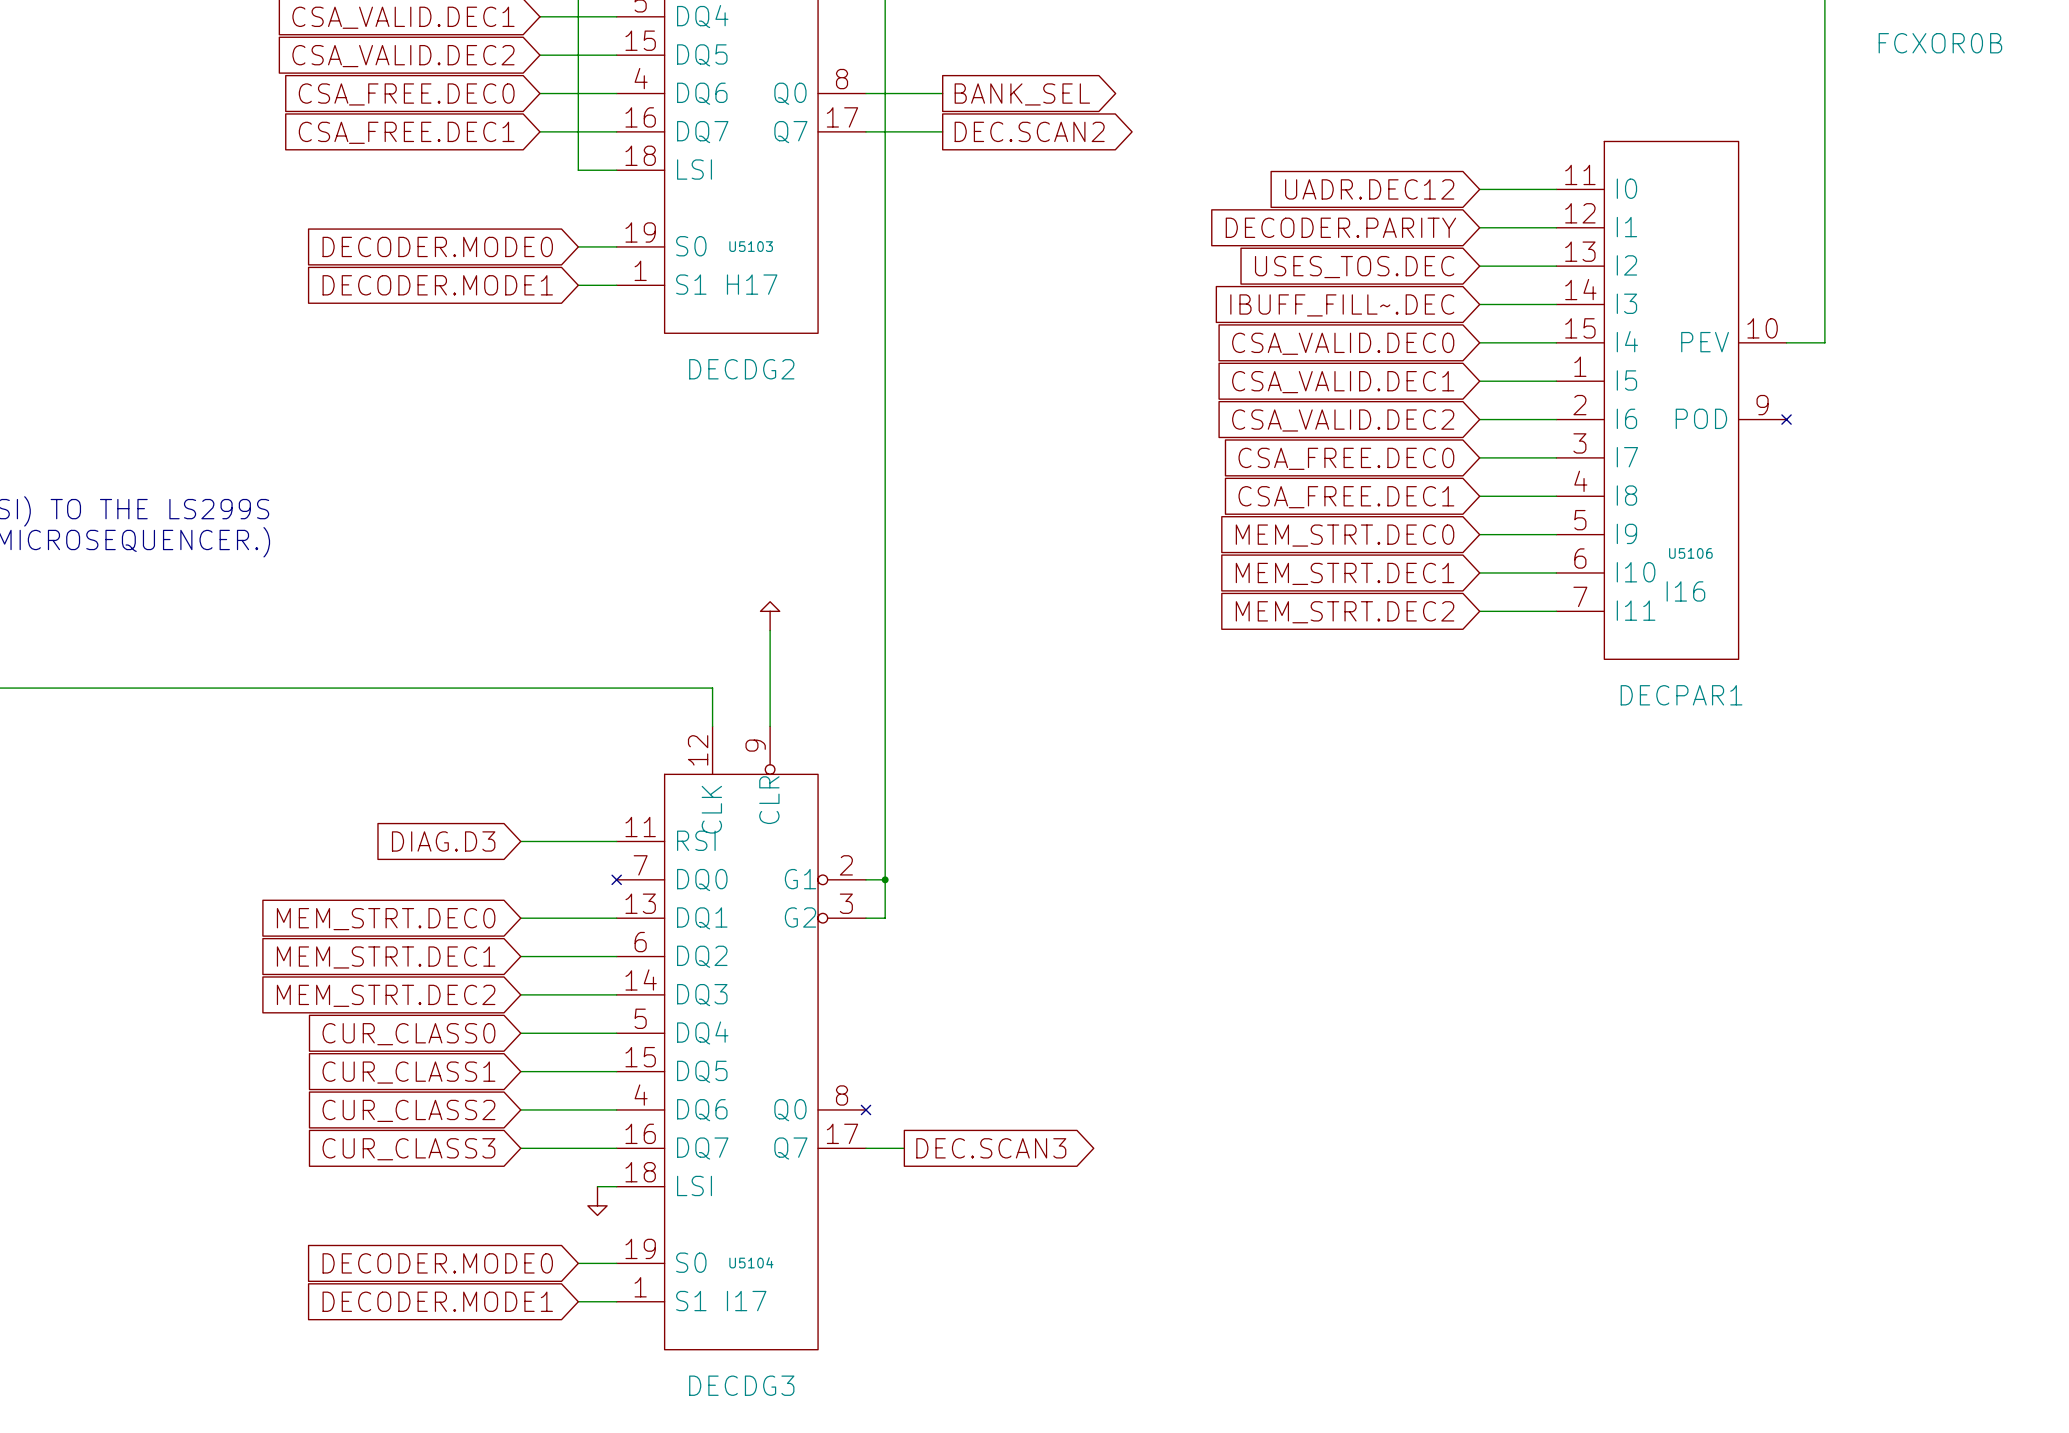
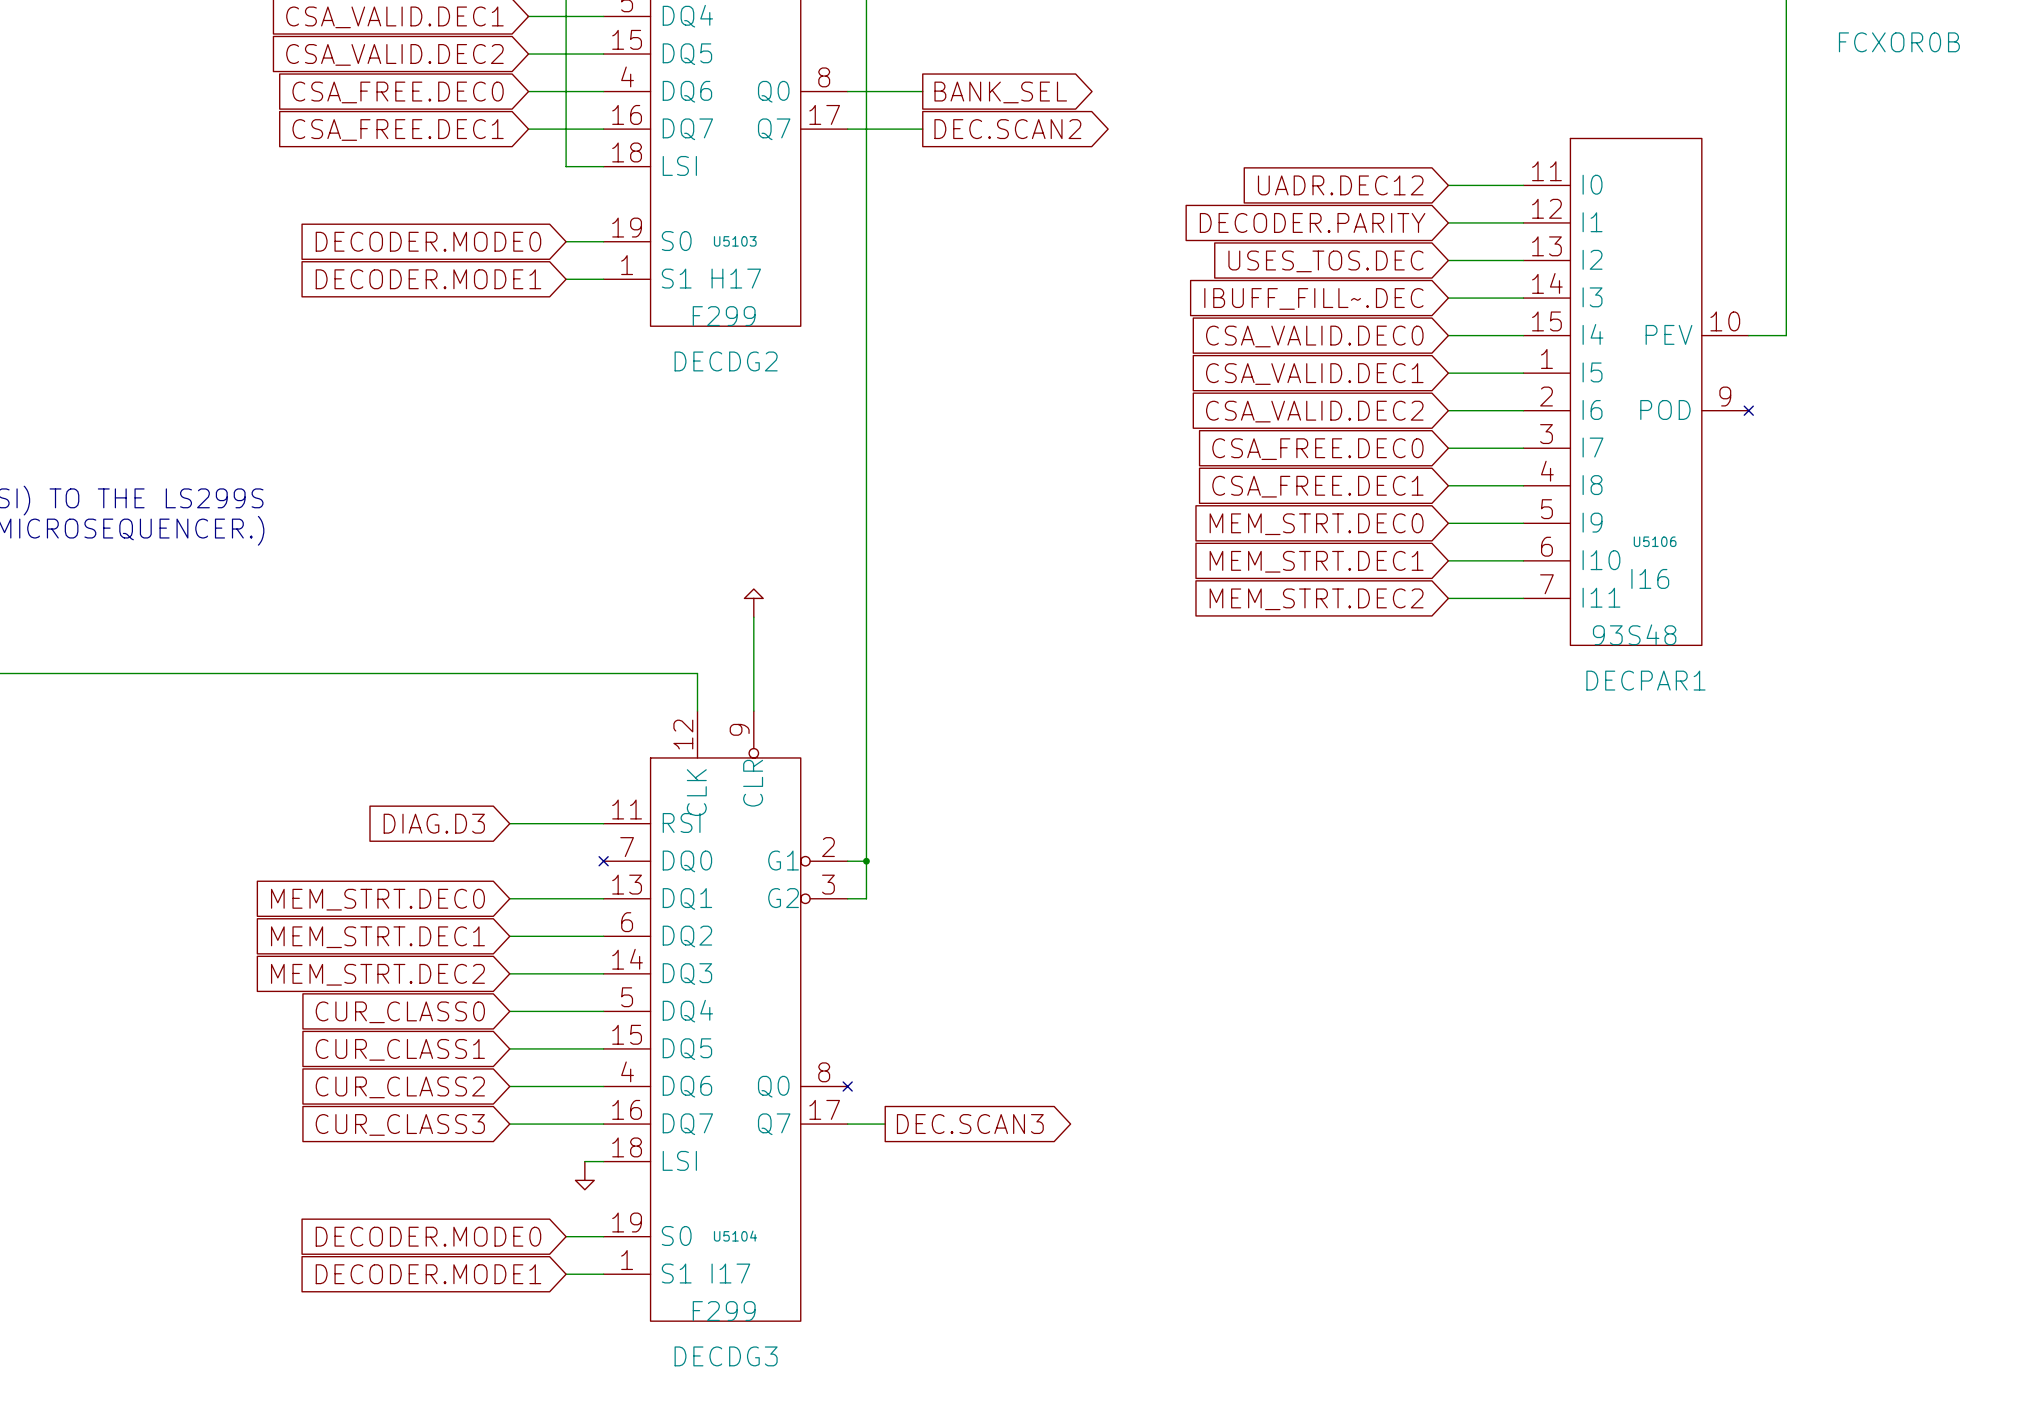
U5103 value: none -> F299 (724, 316)
U5106 value: none -> 93S48 (1634, 634)
U5104 value: none -> F299 (724, 1311)

